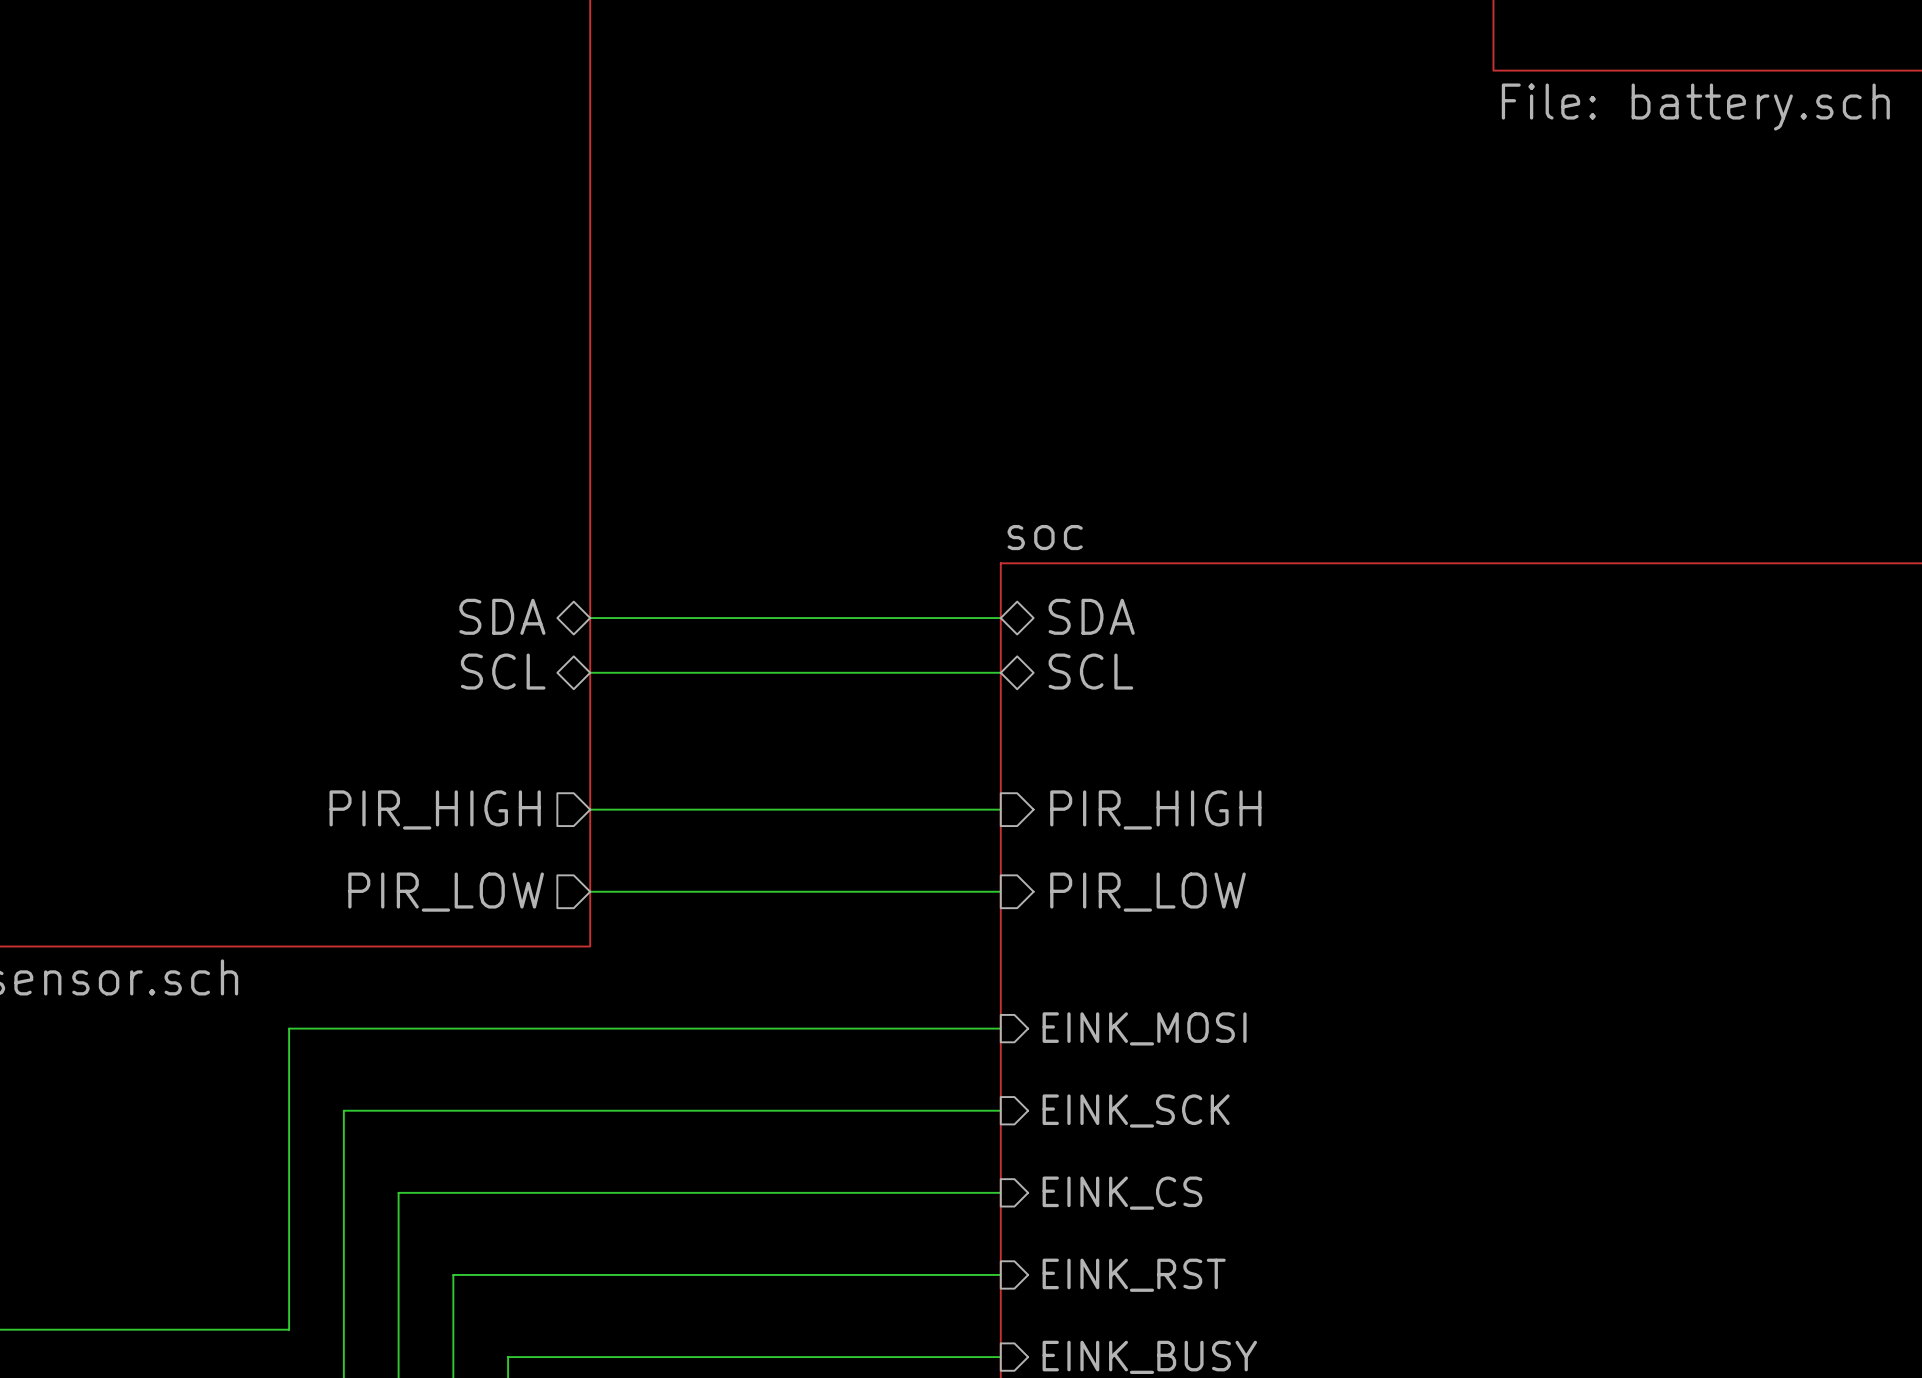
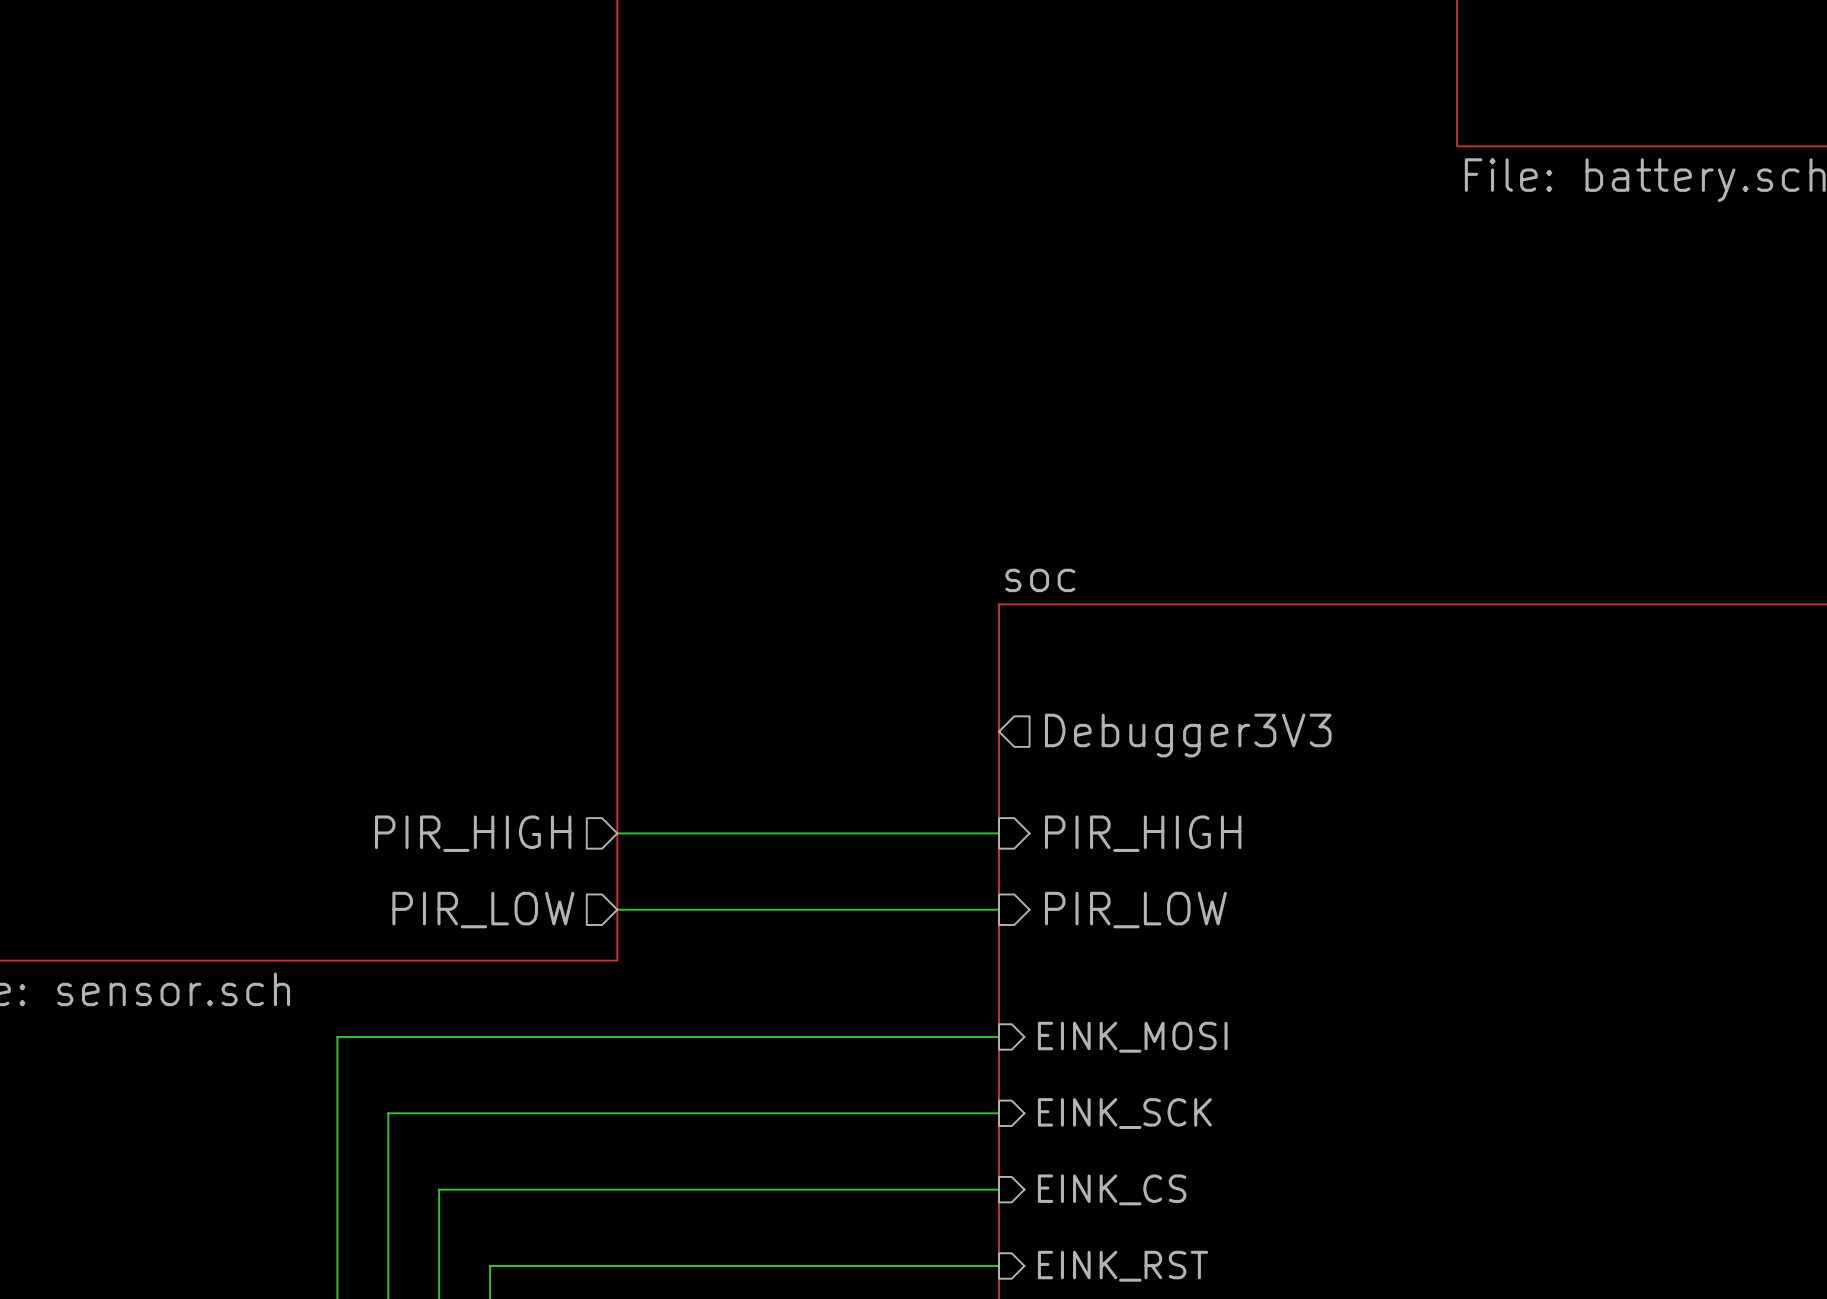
sheet pin: SDA (502, 616) -> none
sheet pin: SDA (1091, 616) -> none
wire: (590, 618) (1000, 618) -> none
sheet pin: SCL (503, 671) -> none
sheet pin: SCL (1090, 671) -> none
wire: (590, 672) (1000, 672) -> none
sheet pin: none -> Debugger3V3 (1188, 735)

